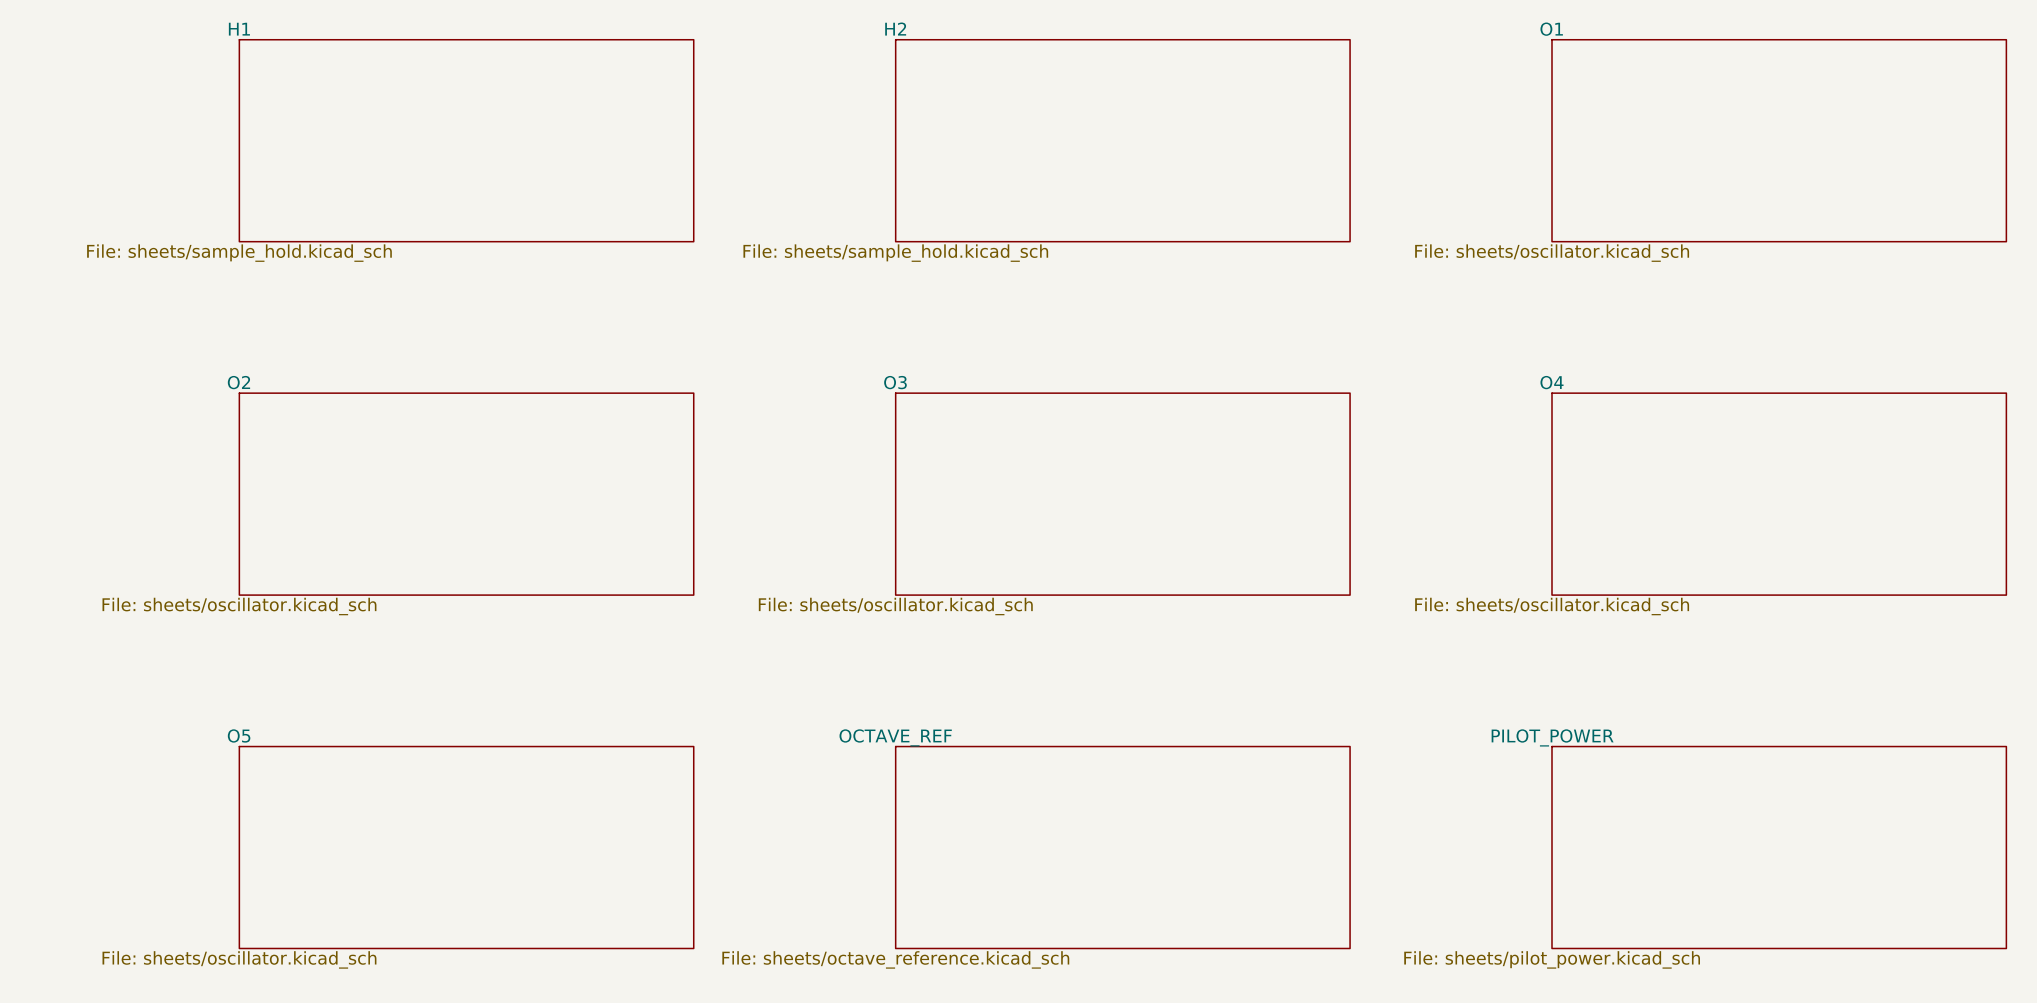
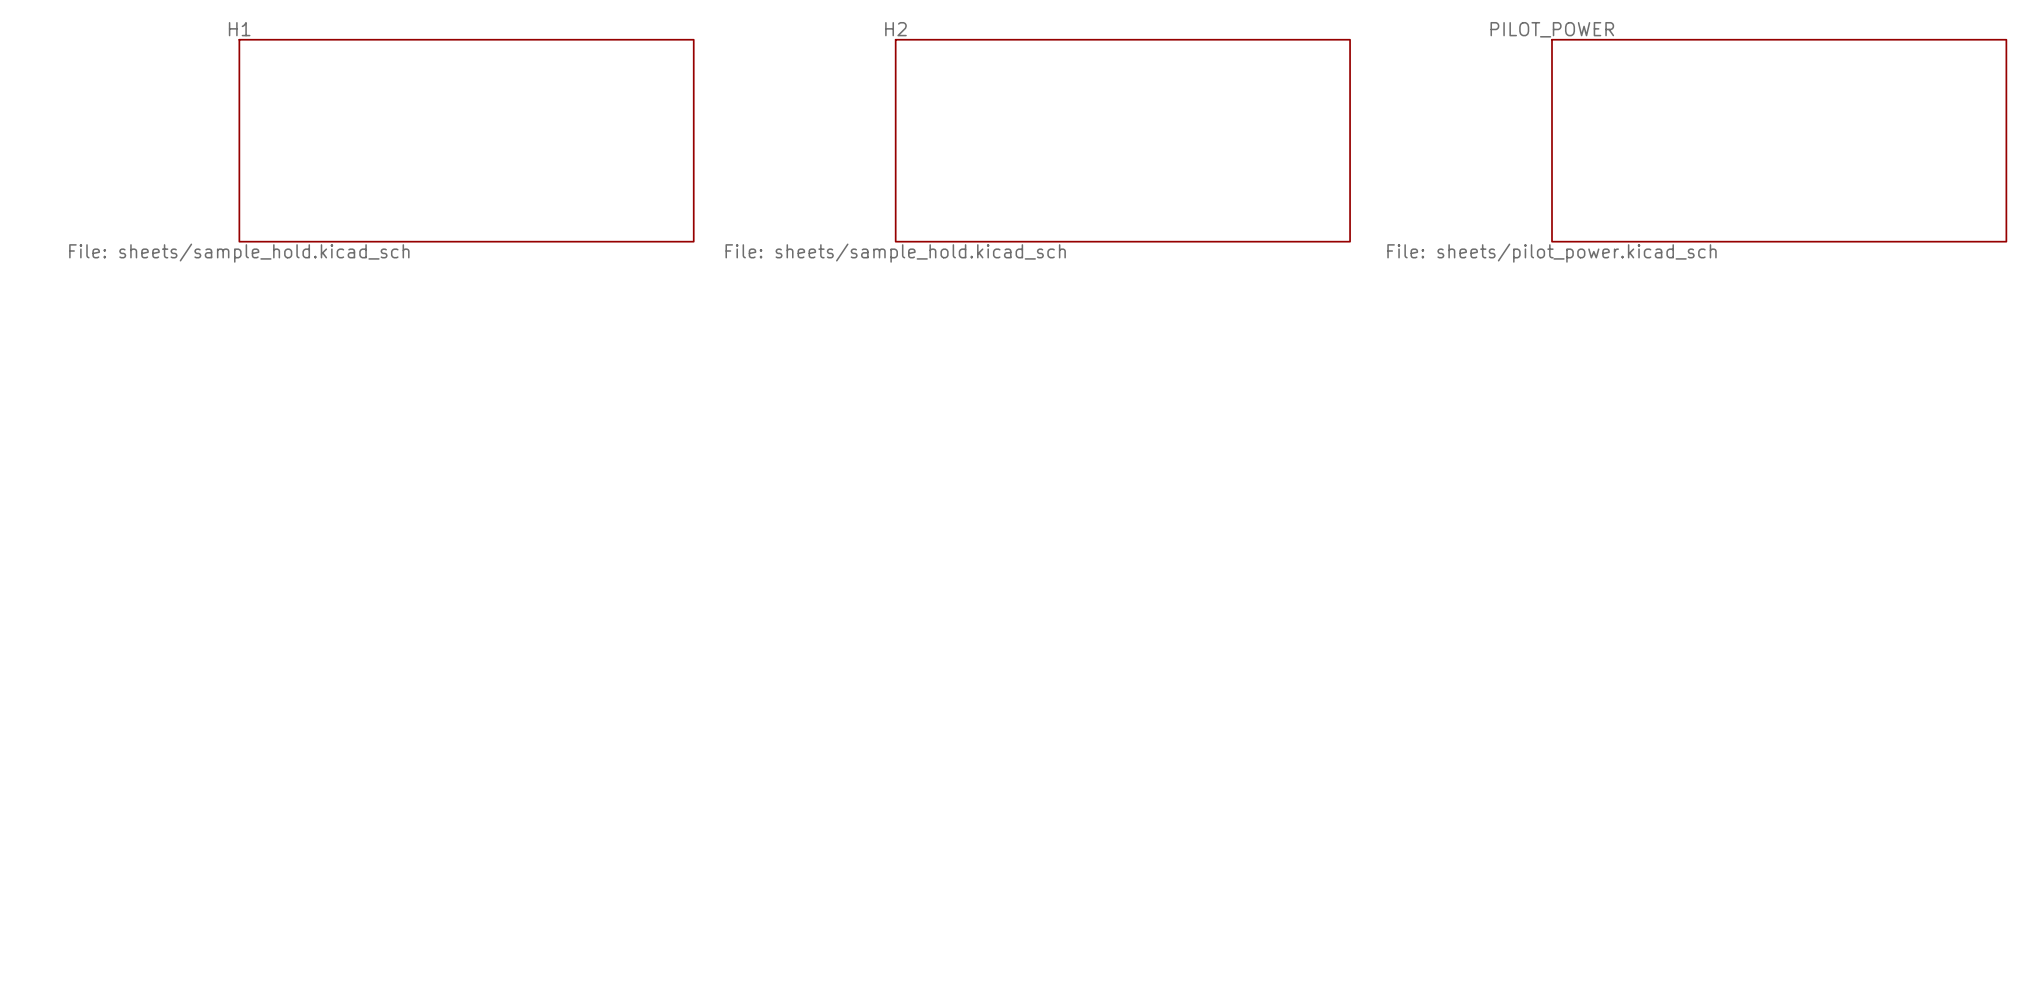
sheet O1 name: O1 (1551, 29) -> PILOT_POWER (1552, 29)
sheet O1 value: File: sheets/oscillator.kicad_sch (1552, 253) -> File: sheets/pilot_power.kicad_sch (1551, 253)
sheet O2: File: sheets/oscillator.kicad_sch (466, 494) -> none
sheet O3: File: sheets/oscillator.kicad_sch (1122, 494) -> none
sheet O4: File: sheets/oscillator.kicad_sch (1779, 494) -> none
sheet O5: File: sheets/oscillator.kicad_sch (466, 847) -> none
sheet OCTAVE_REF: File: sheets/octave_reference.kicad_sch (1122, 847) -> none
sheet PILOT_POWER: File: sheets/pilot_power.kicad_sch (1779, 847) -> none

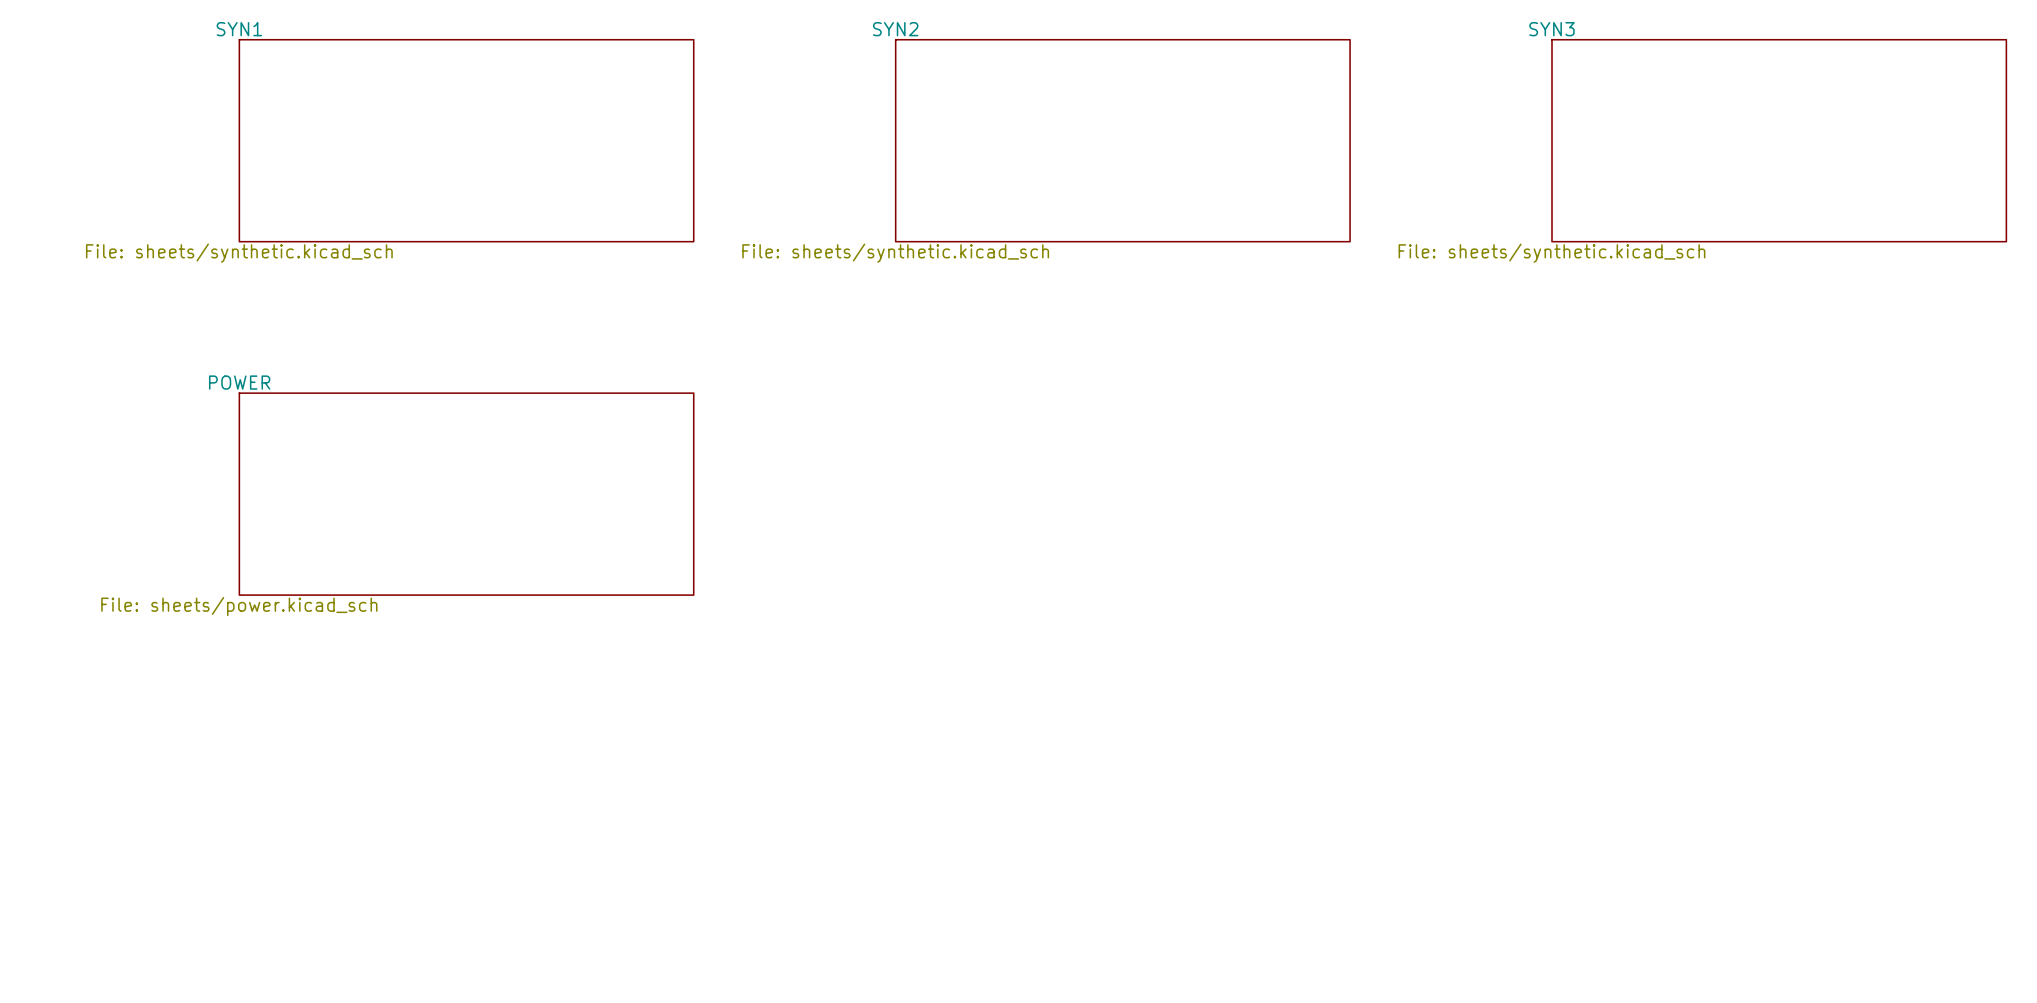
sheet H1 name: H1 (239, 29) -> SYN1 (239, 29)
sheet H2 name: H2 (895, 29) -> SYN2 (895, 29)
sheet PILOT_POWER name: PILOT_POWER (1552, 29) -> SYN3 (1551, 29)
sheet H1 value: File: sheets/sample_hold.kicad_sch (239, 253) -> File: sheets/synthetic.kicad_sch (239, 253)
sheet H2 value: File: sheets/sample_hold.kicad_sch (895, 253) -> File: sheets/synthetic.kicad_sch (895, 253)
sheet PILOT_POWER value: File: sheets/pilot_power.kicad_sch (1551, 253) -> File: sheets/synthetic.kicad_sch (1551, 253)
sheet POWER: none -> File: sheets/power.kicad_sch (466, 494)

